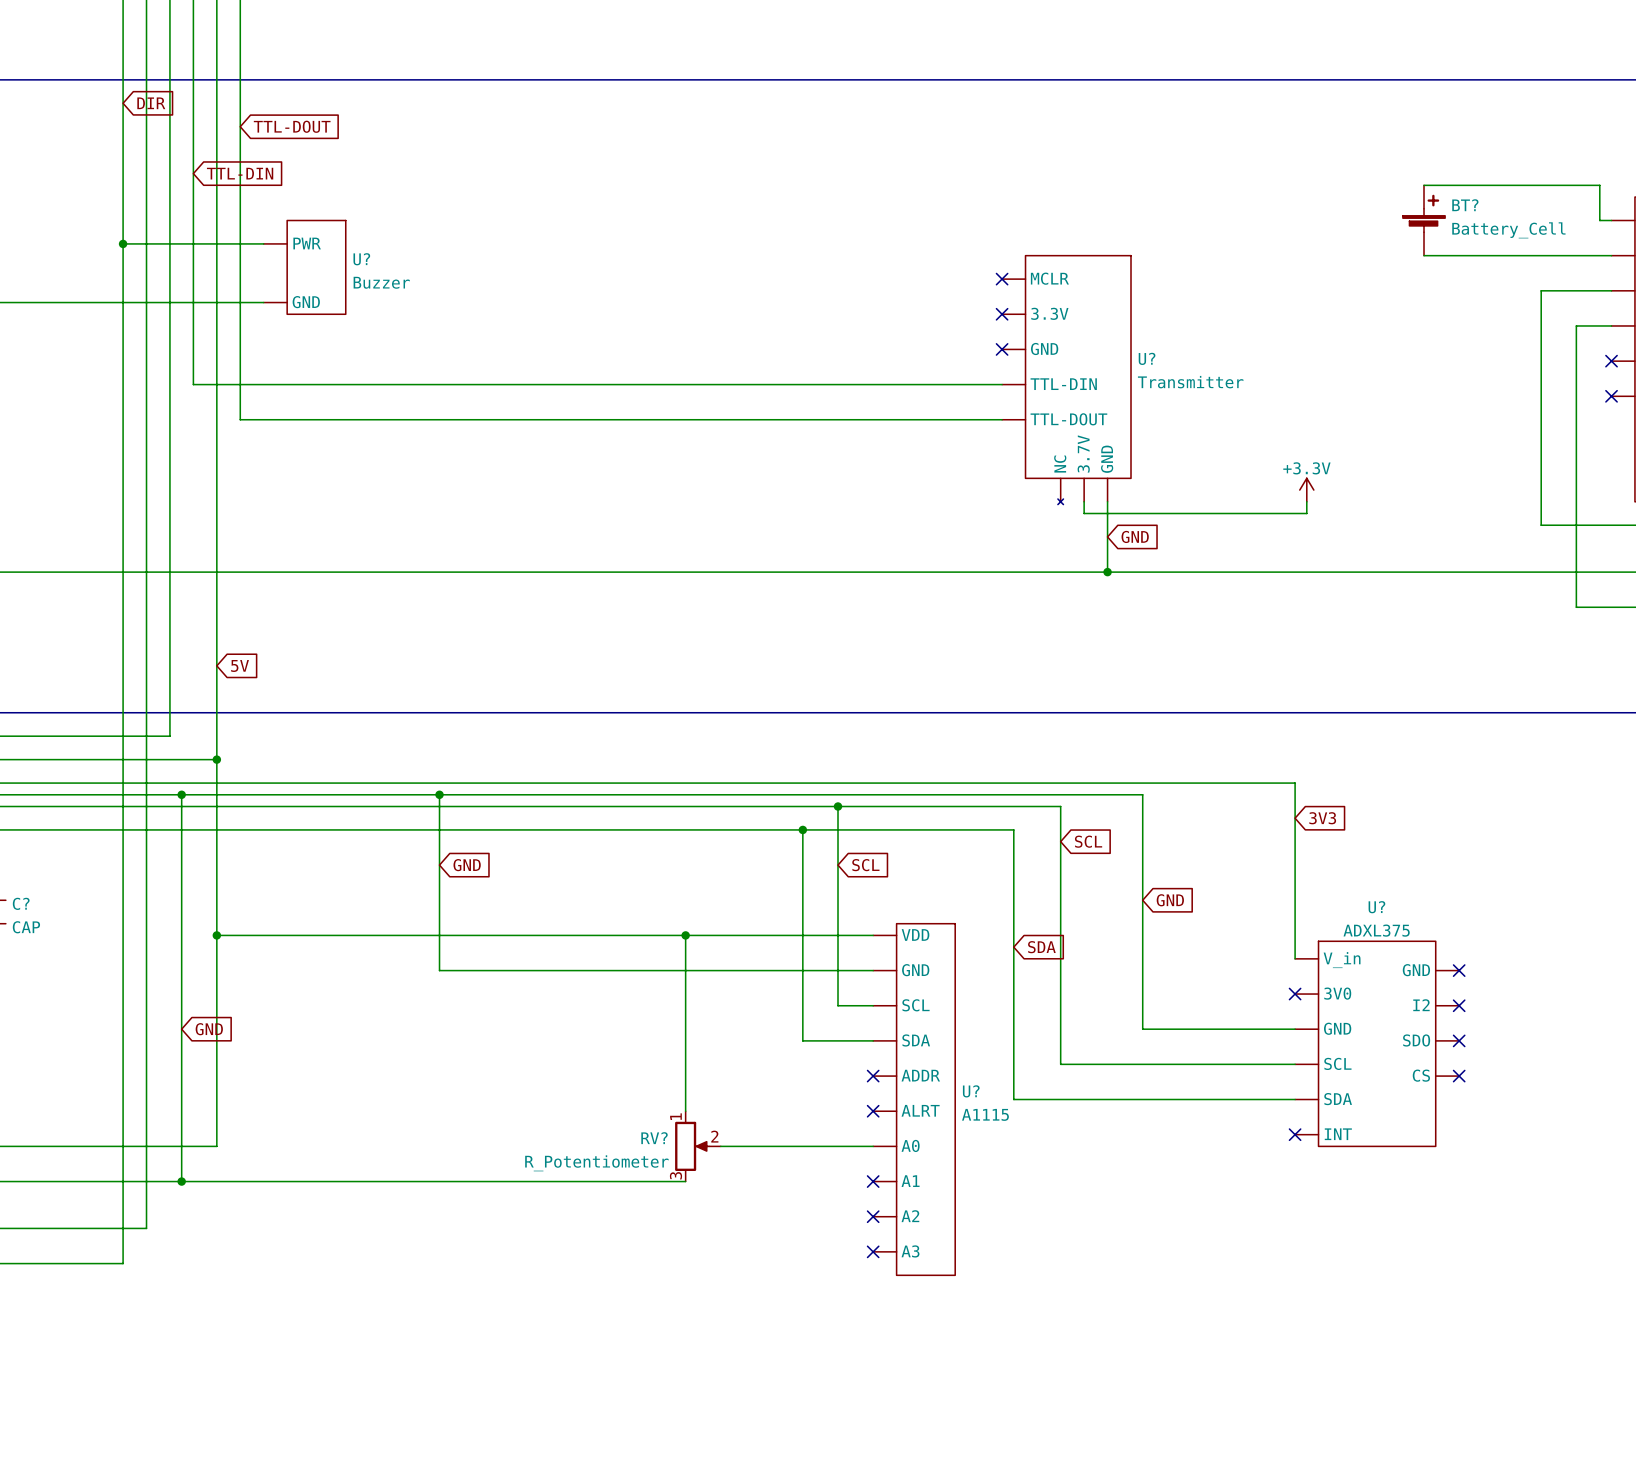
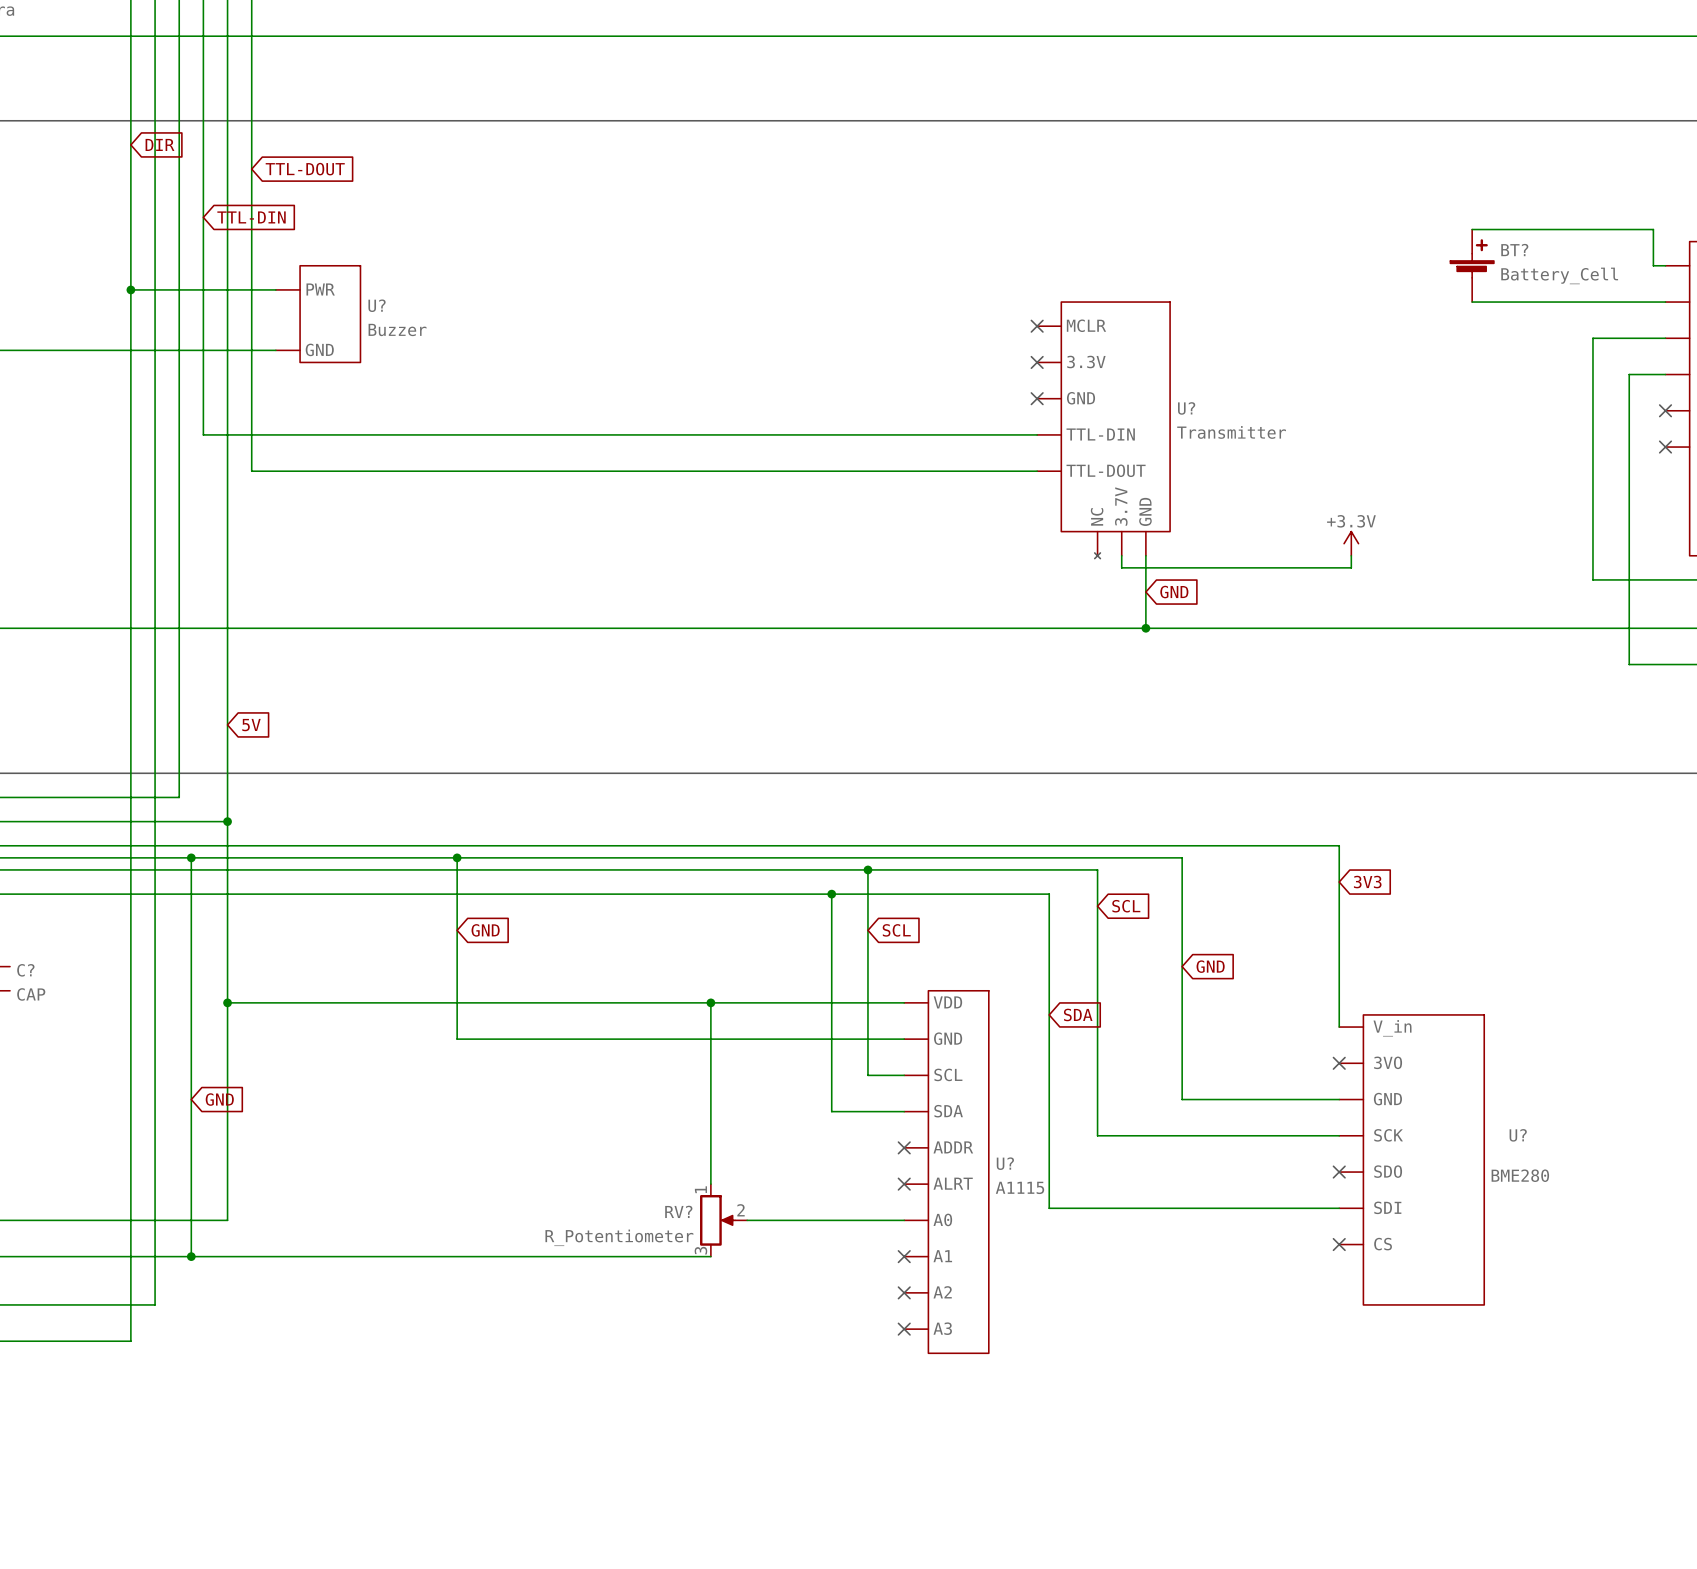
no-connect mark: (1459, 970) -> none
no-connect mark: (1459, 1005) -> none
no-connect mark: (1459, 1040) -> none
U?: ADXL375 (1377, 1043) -> none
no-connect mark: (1459, 1076) -> none
U?: none -> BME280 (1411, 1159)
wire: (1013, 1099) (1295, 1099) -> (1049, 1172) (1049, 1208) (1339, 1208)
no-connect mark: none -> (1339, 1172)
no-connect mark: (1295, 1134) -> none
no-connect mark: none -> (1339, 1244)

